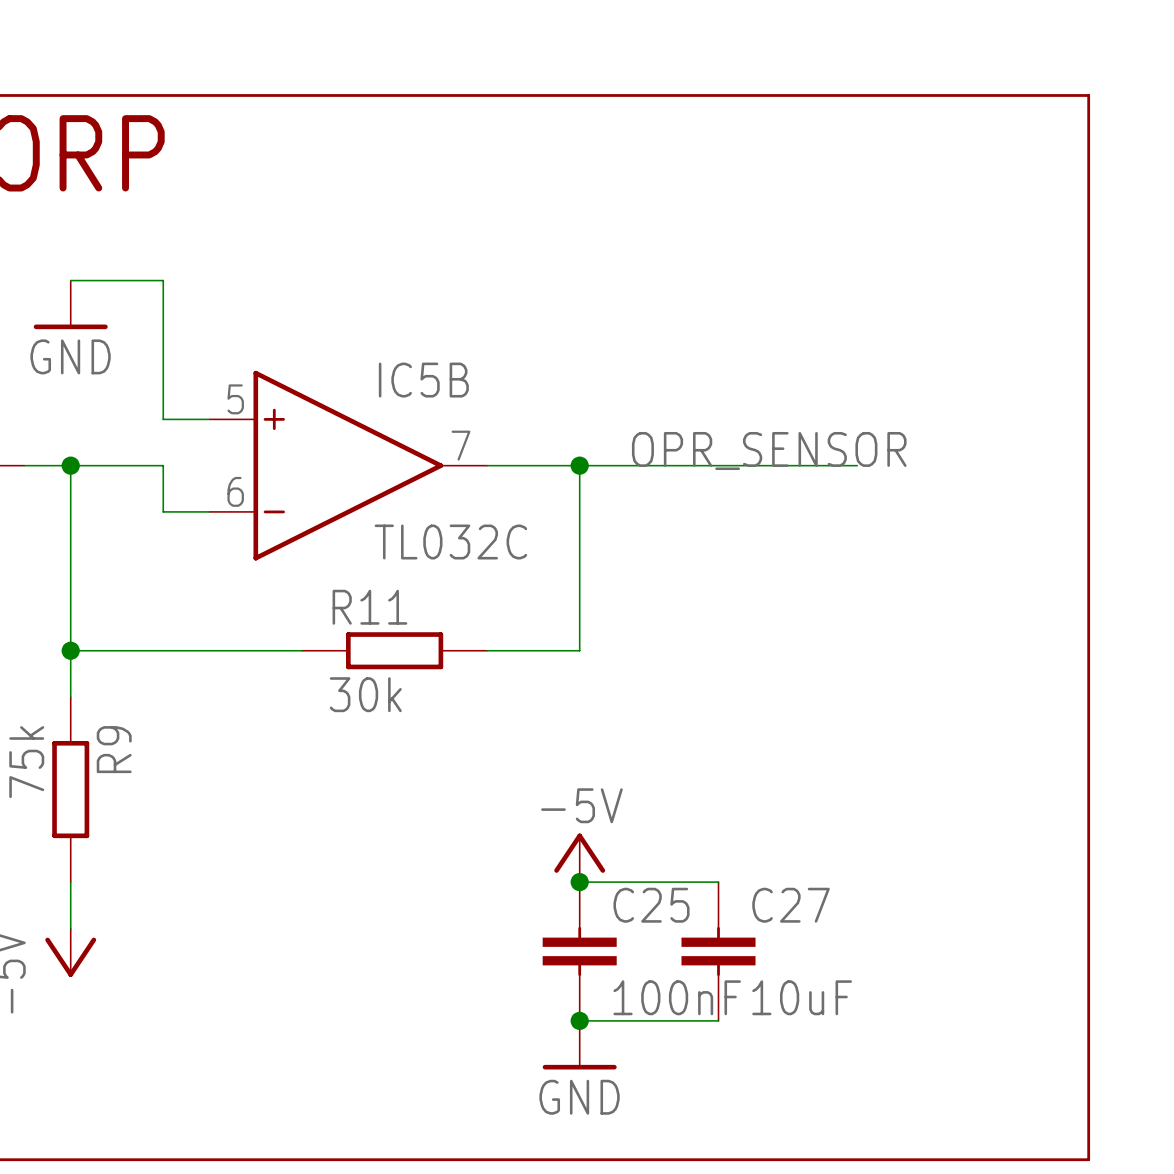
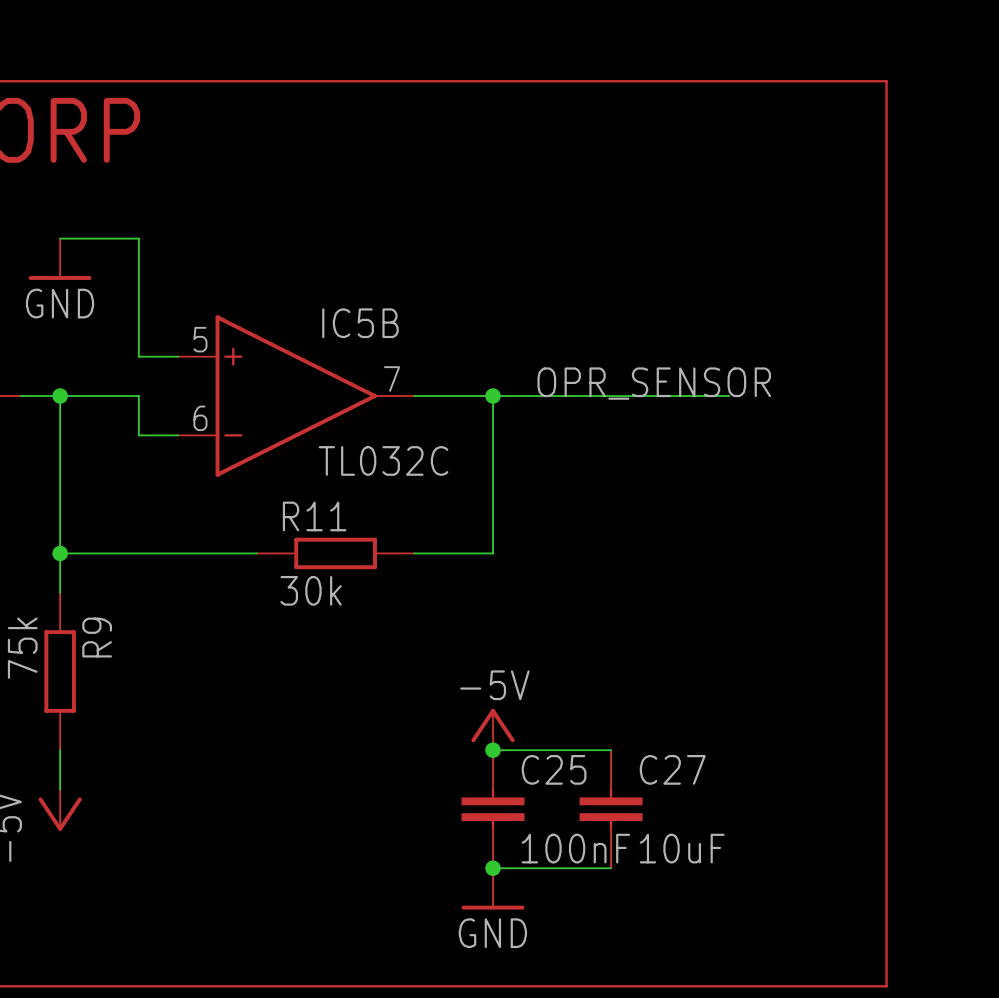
line: (1042, 95) (1088, 95) (1088, 1159) (1042, 1159) -> (886, 81) (886, 986)

